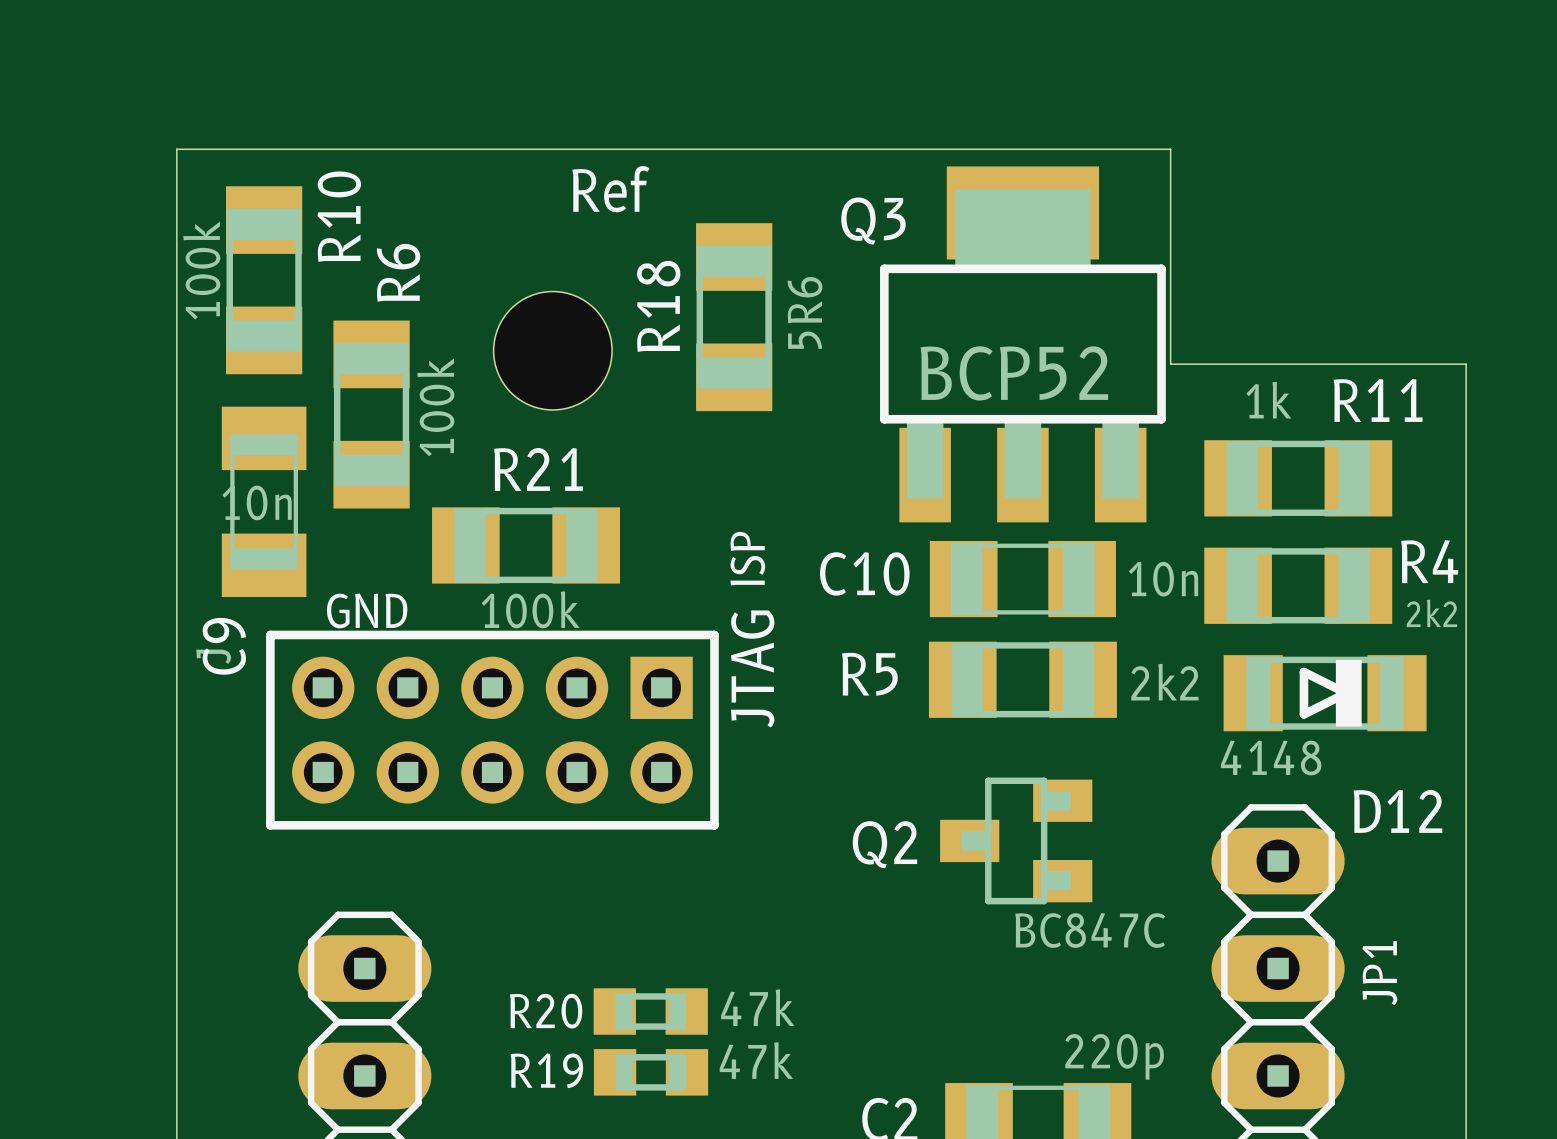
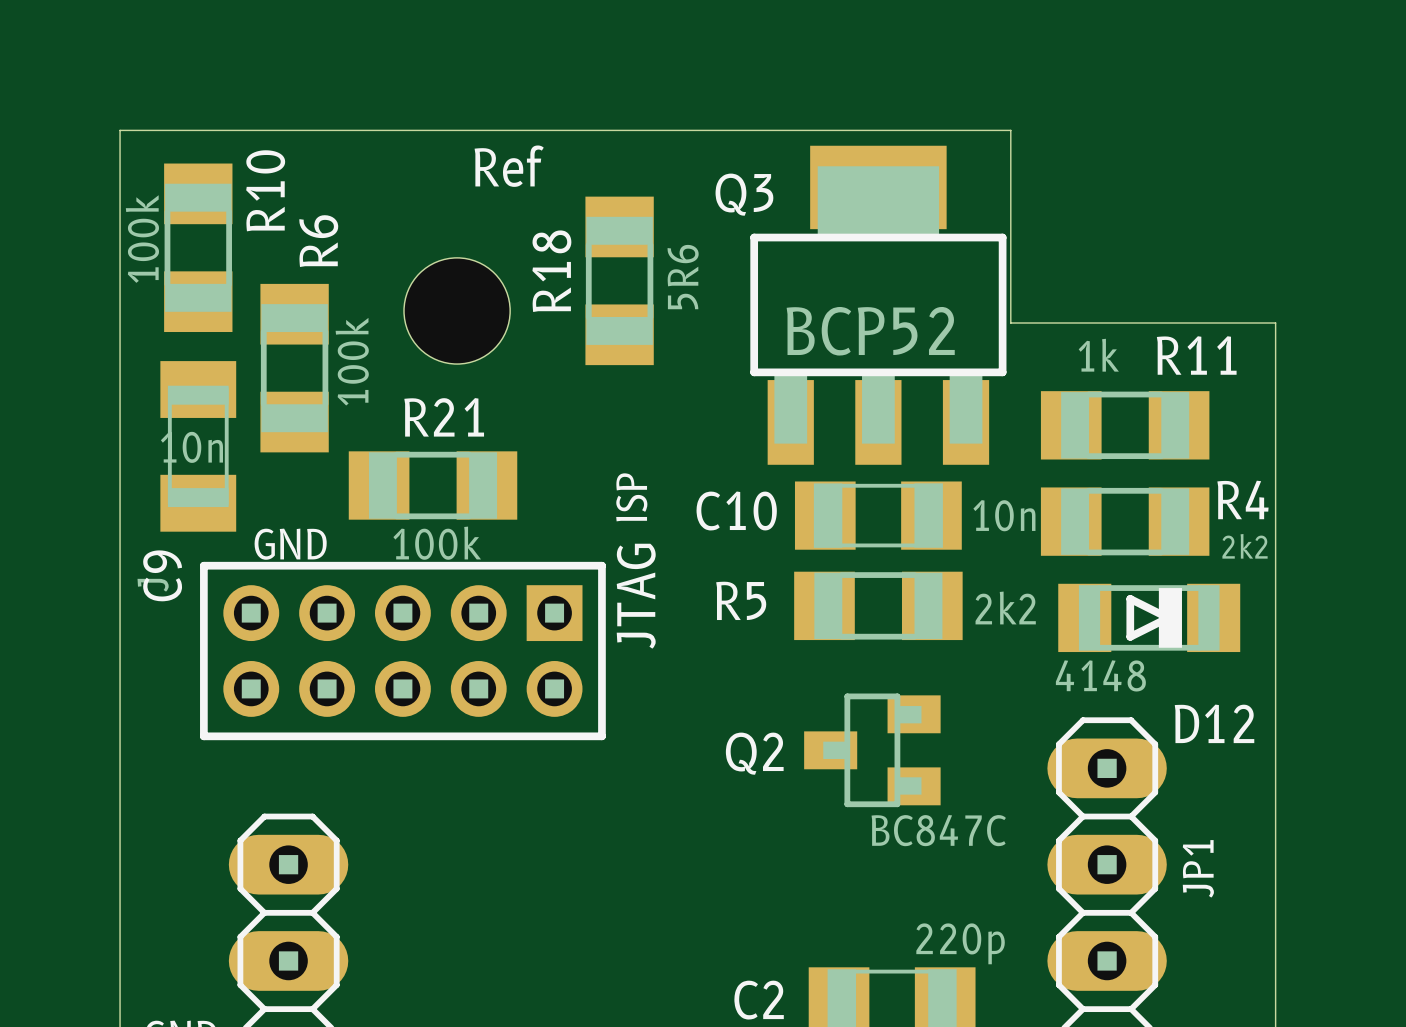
R20: 47k (650, 1011) -> none
R19: 47k (651, 1072) -> none

